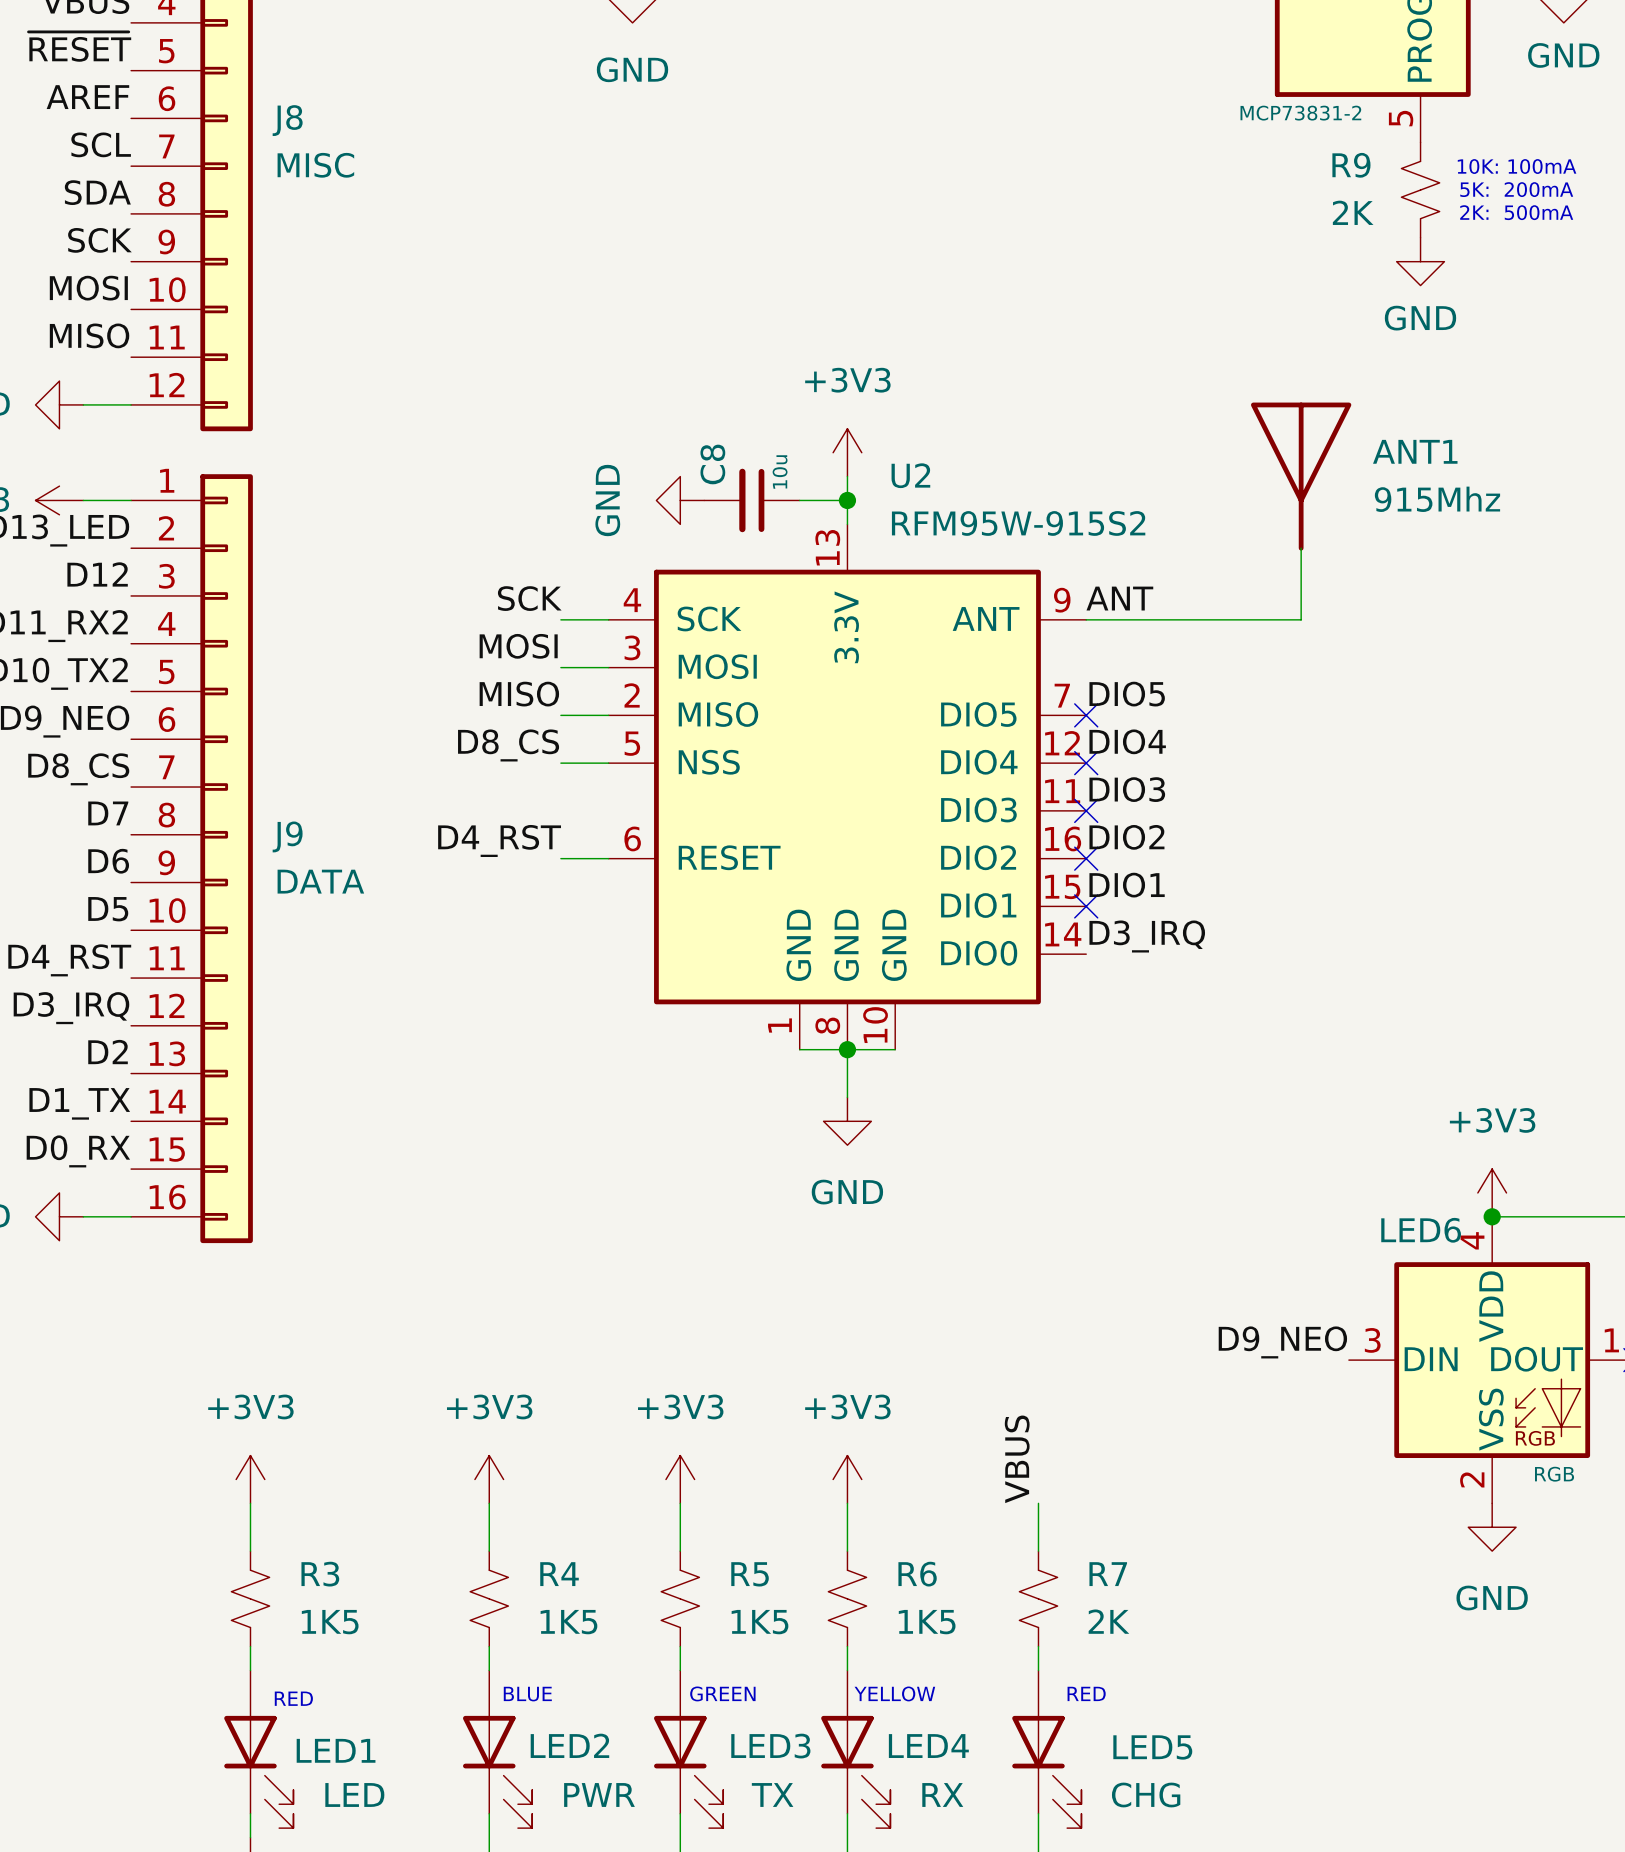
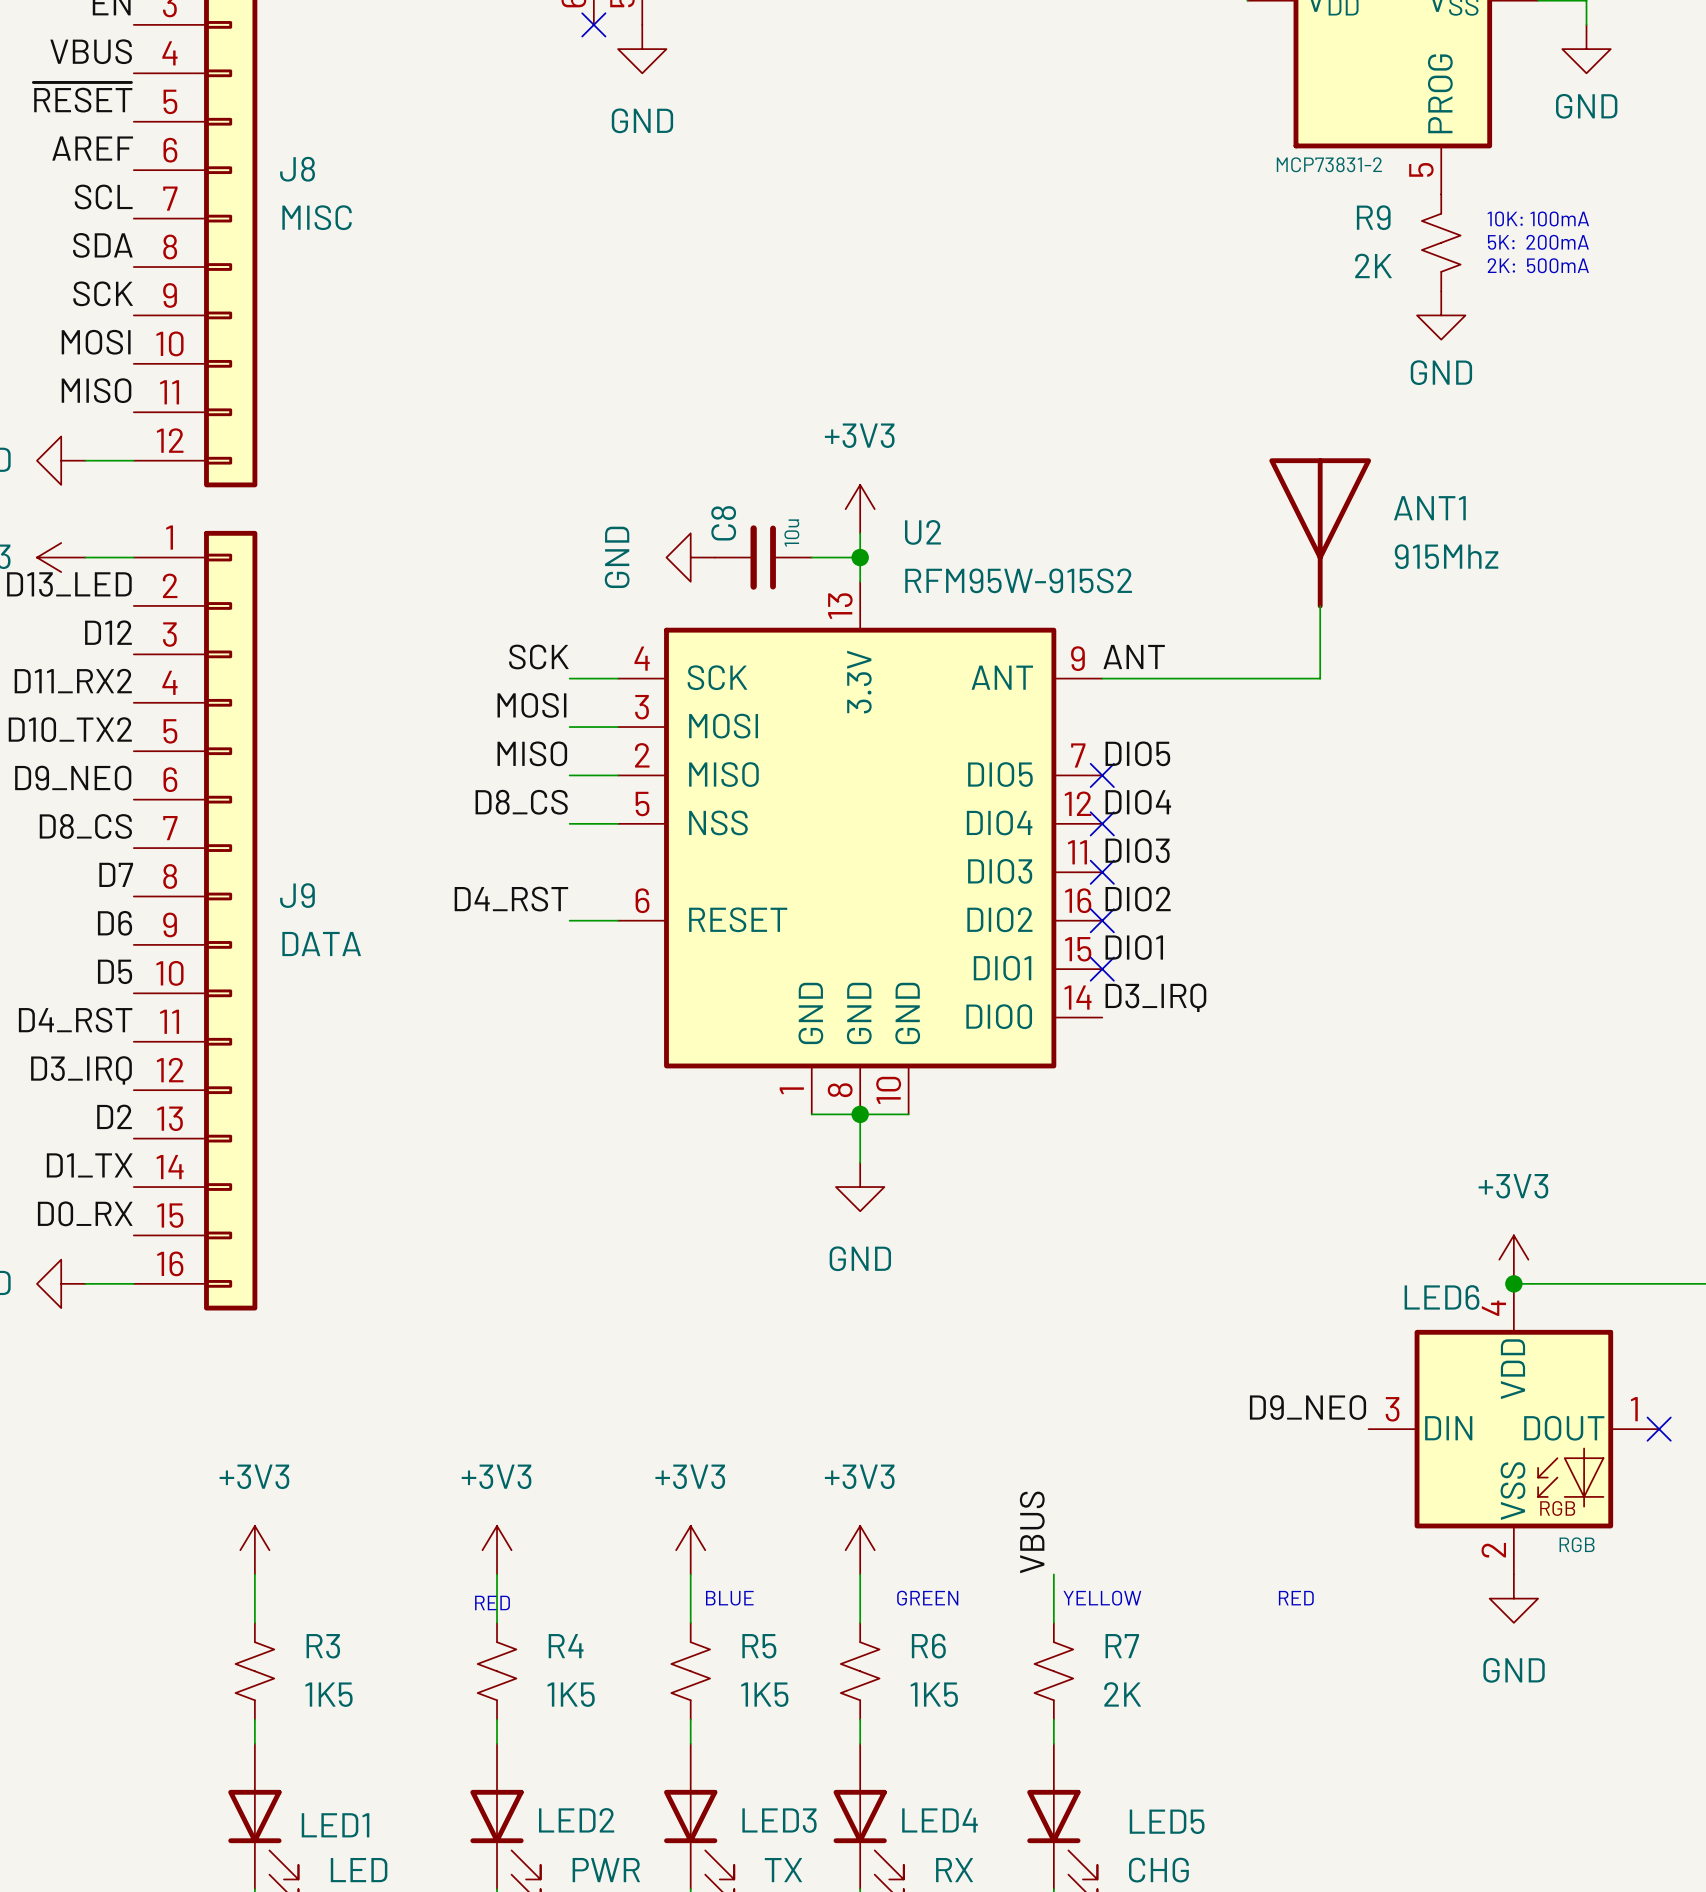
text position: GREEN (722, 1693) -> GREEN (927, 1598)
text position: YELLOW (894, 1693) -> YELLOW (1102, 1598)
text position: RED (1086, 1693) -> RED (1296, 1598)
text position: BLUE (527, 1694) -> BLUE (729, 1598)
text position: RED (293, 1698) -> RED (492, 1602)

